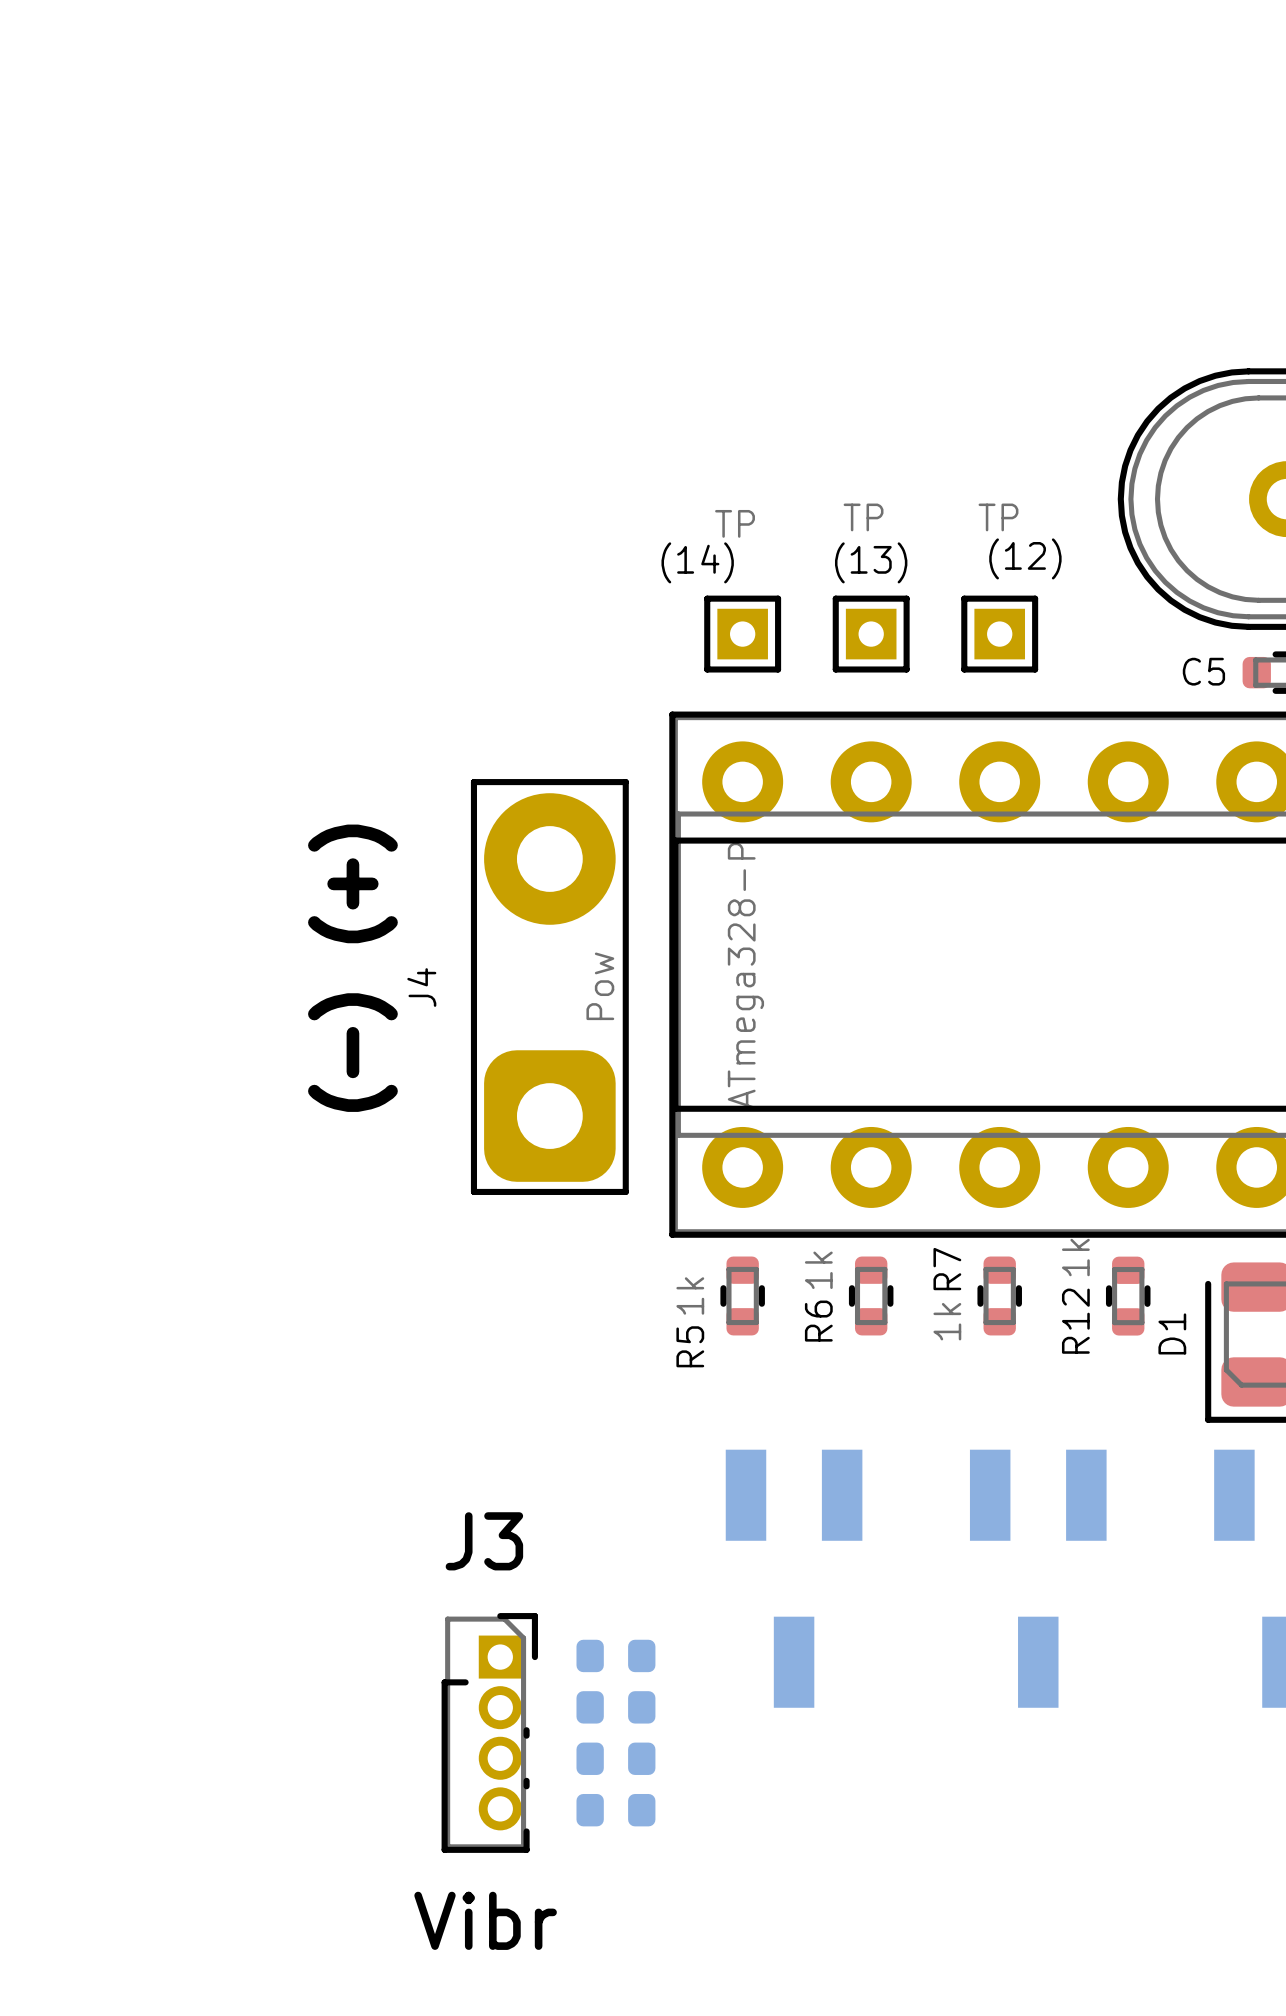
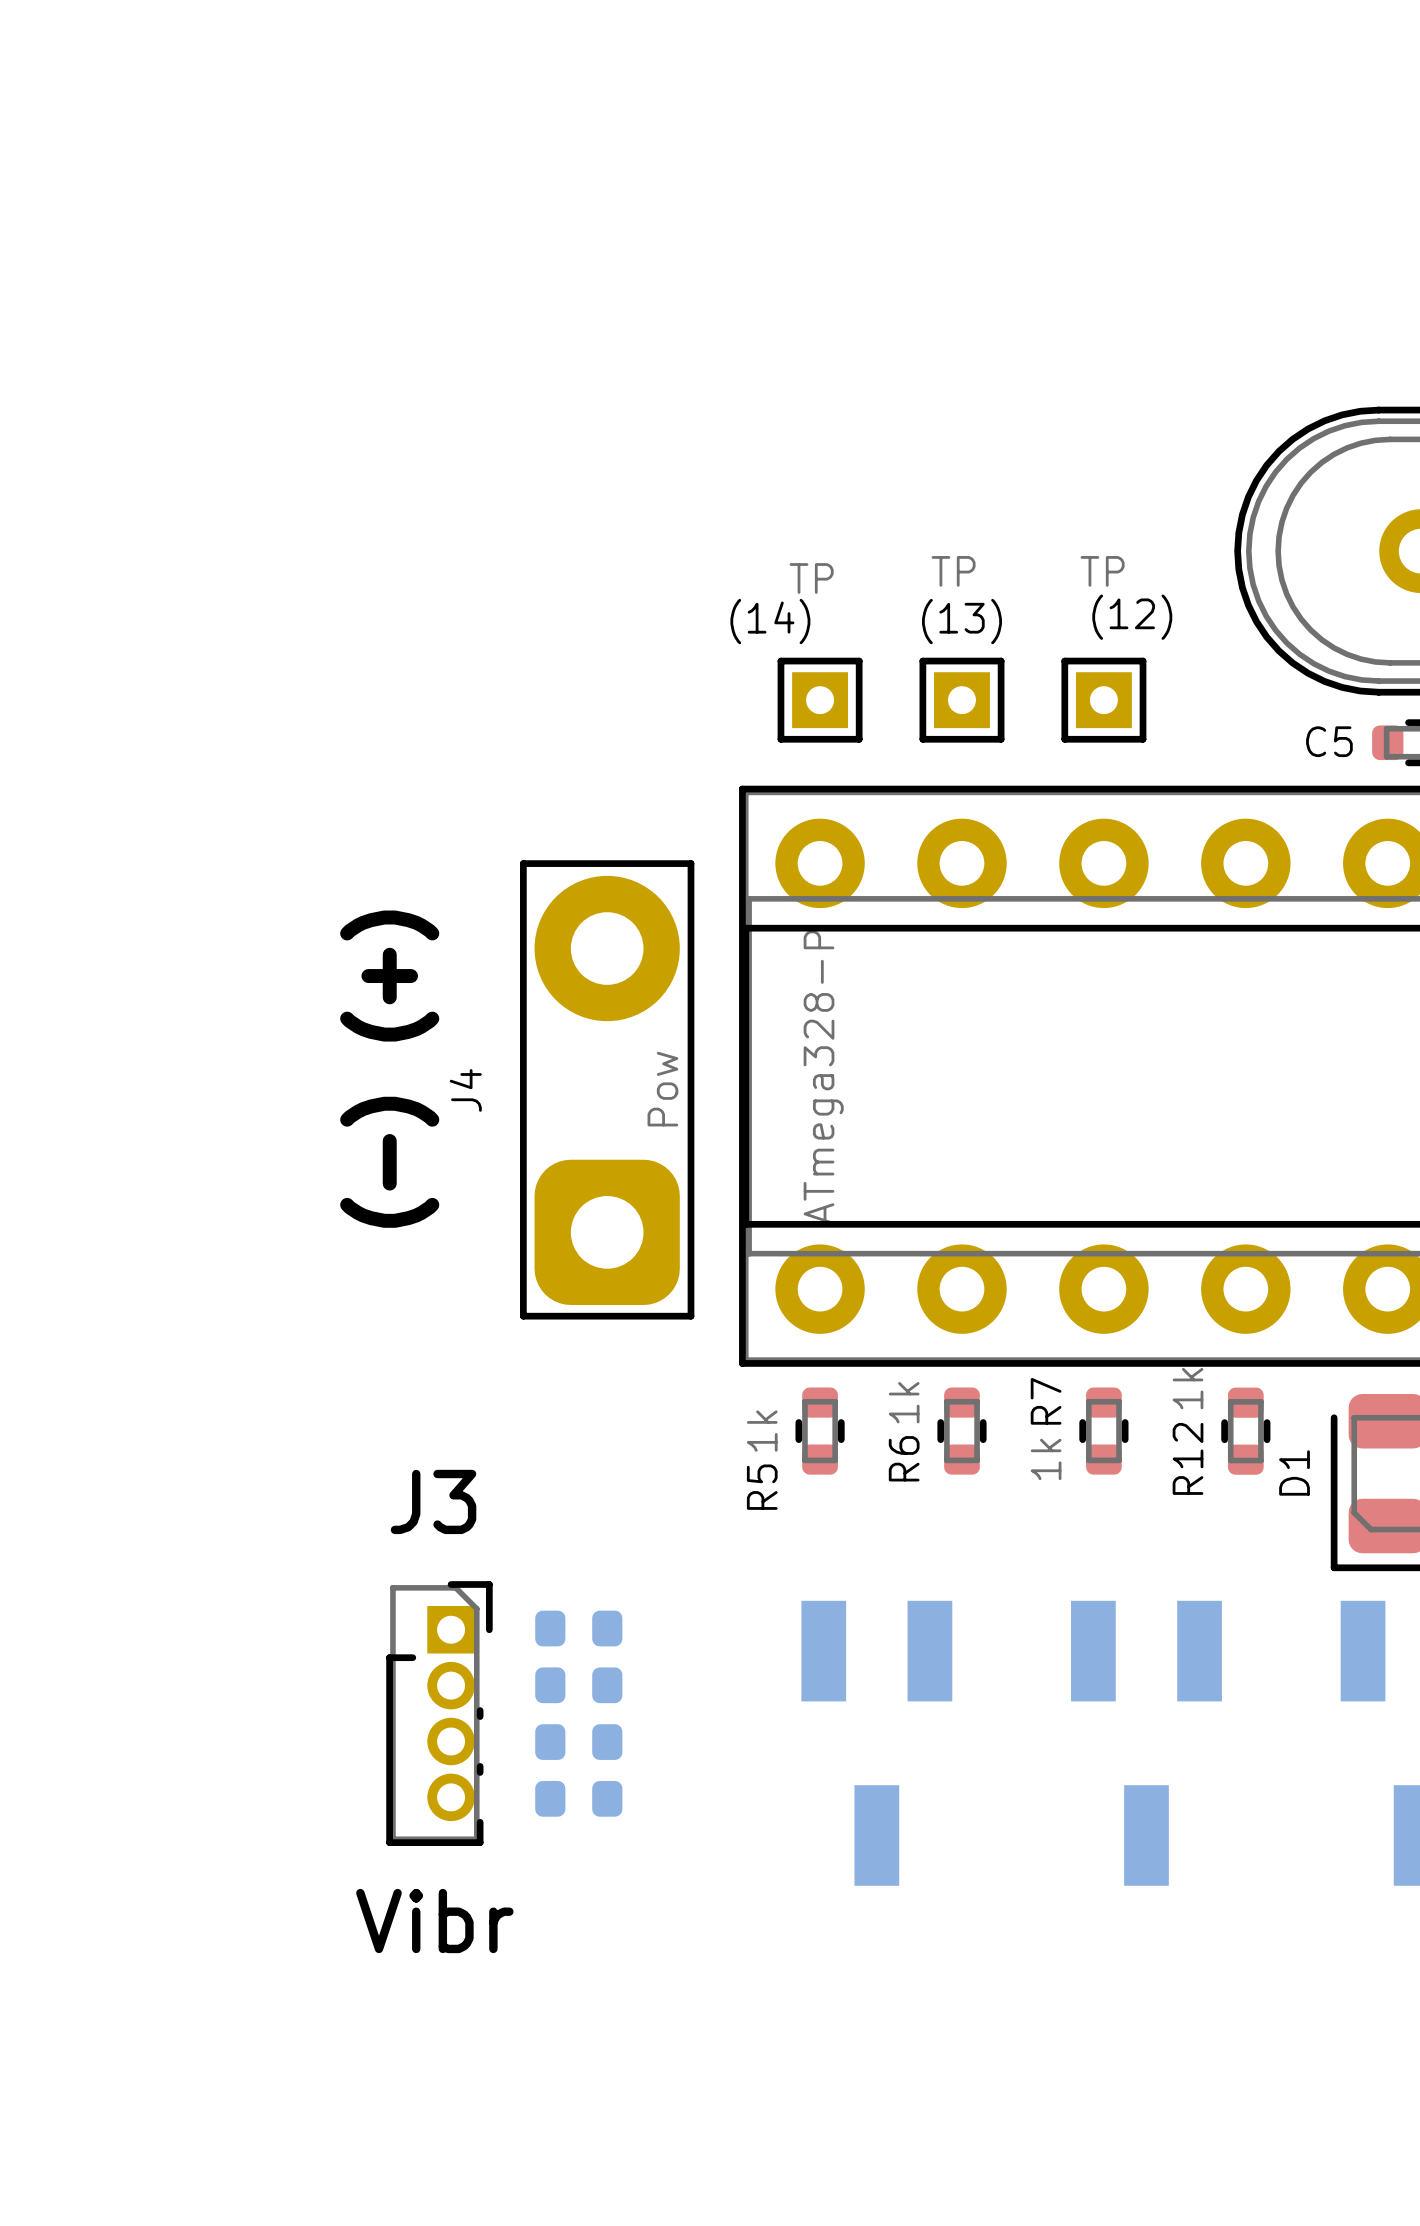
part: none -> (578, 1628)
part: none -> (578, 1685)
part: none -> (578, 1742)
part: none -> (578, 1798)
part: (615, 1655) -> none
part: (615, 1707) -> none
J3 position: (489, 1732) -> (439, 1713)
part: (615, 1758) -> none
part: (615, 1810) -> none

